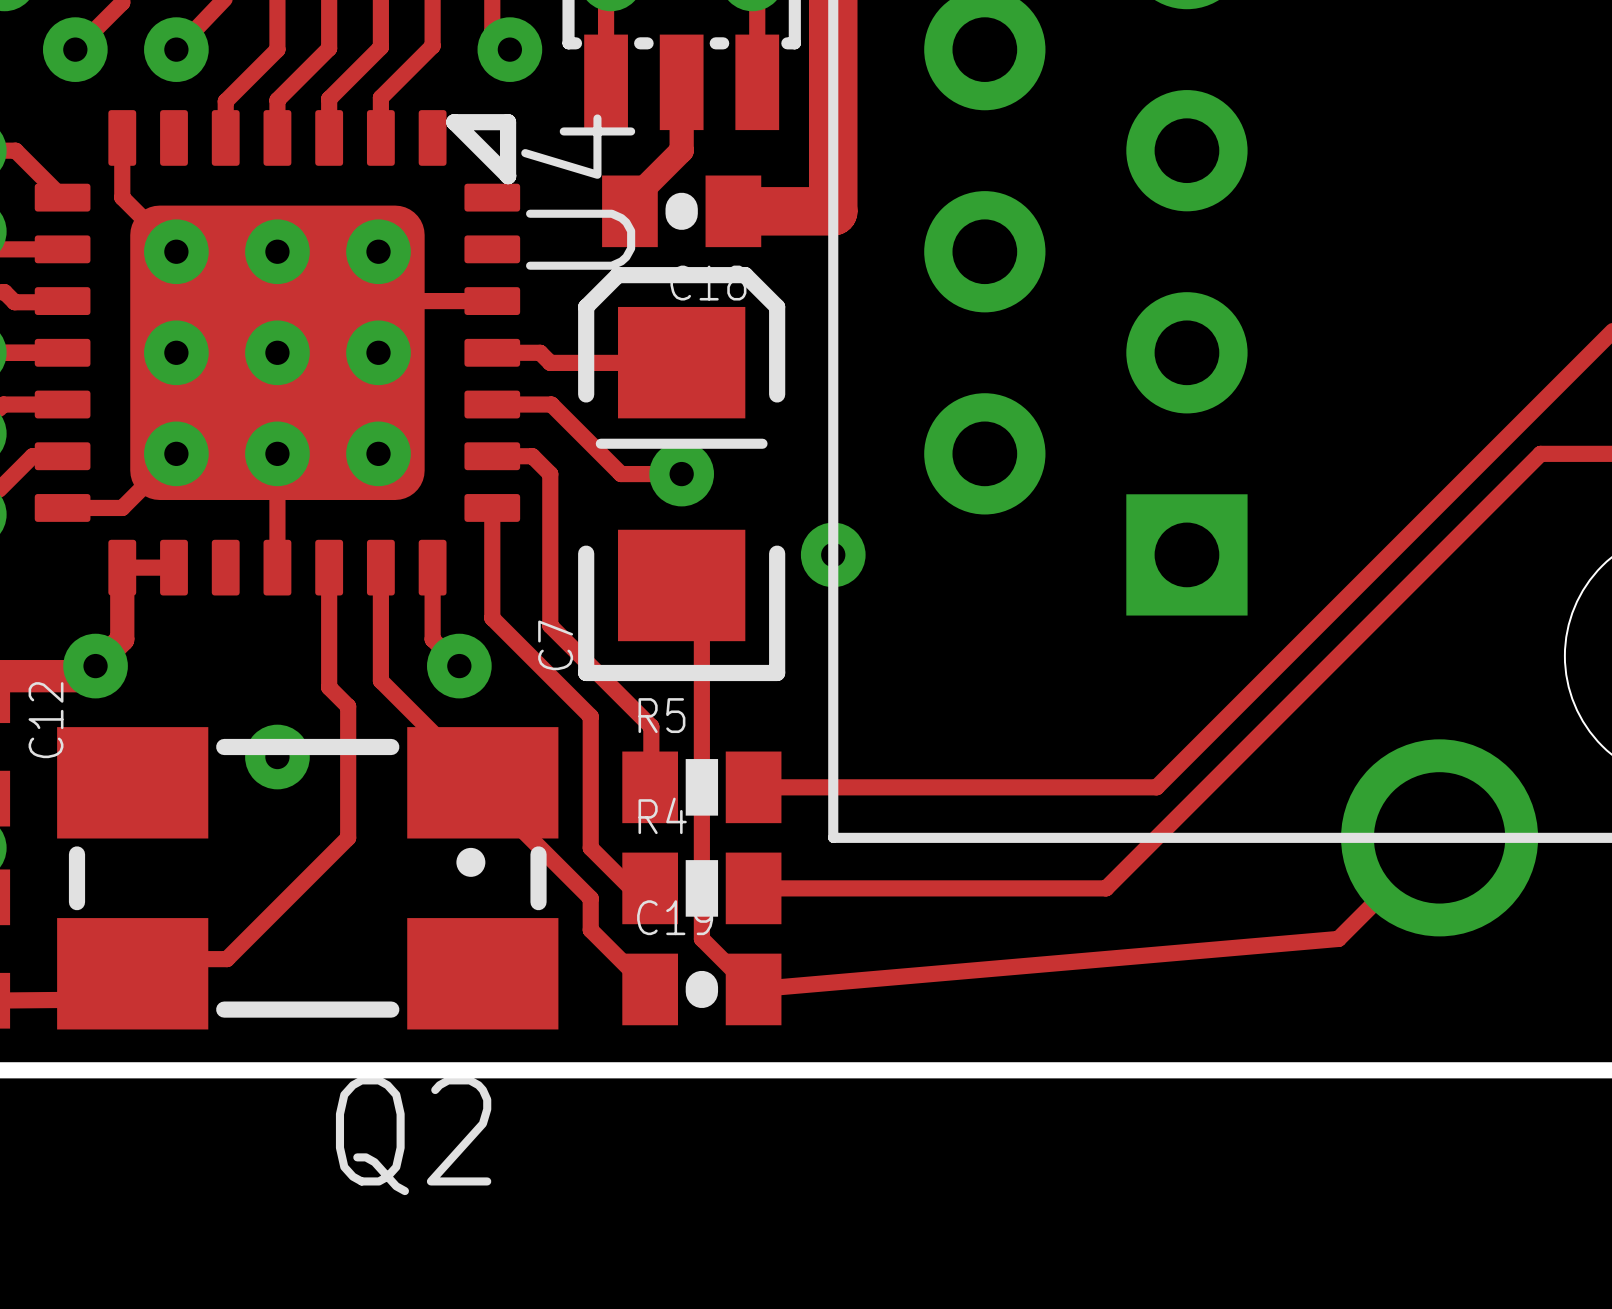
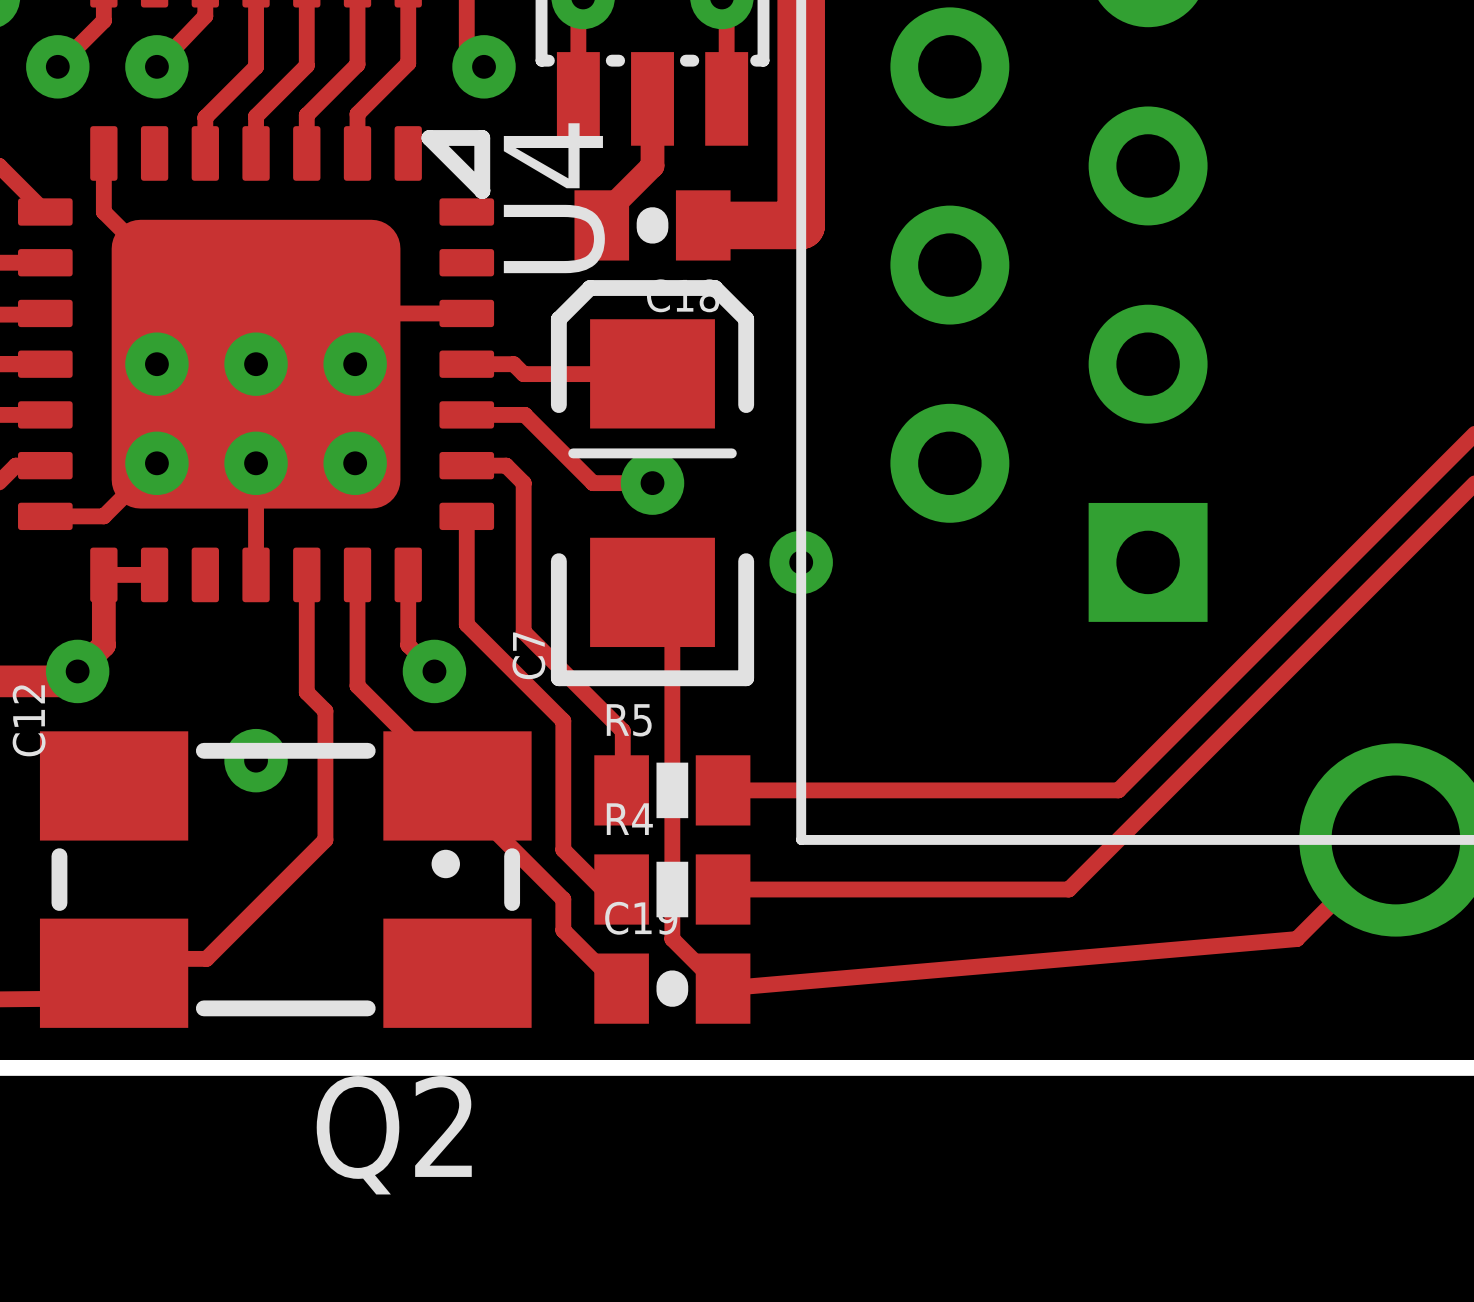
via: (176, 251) -> none
via: (277, 251) -> none
via: (378, 251) -> none

